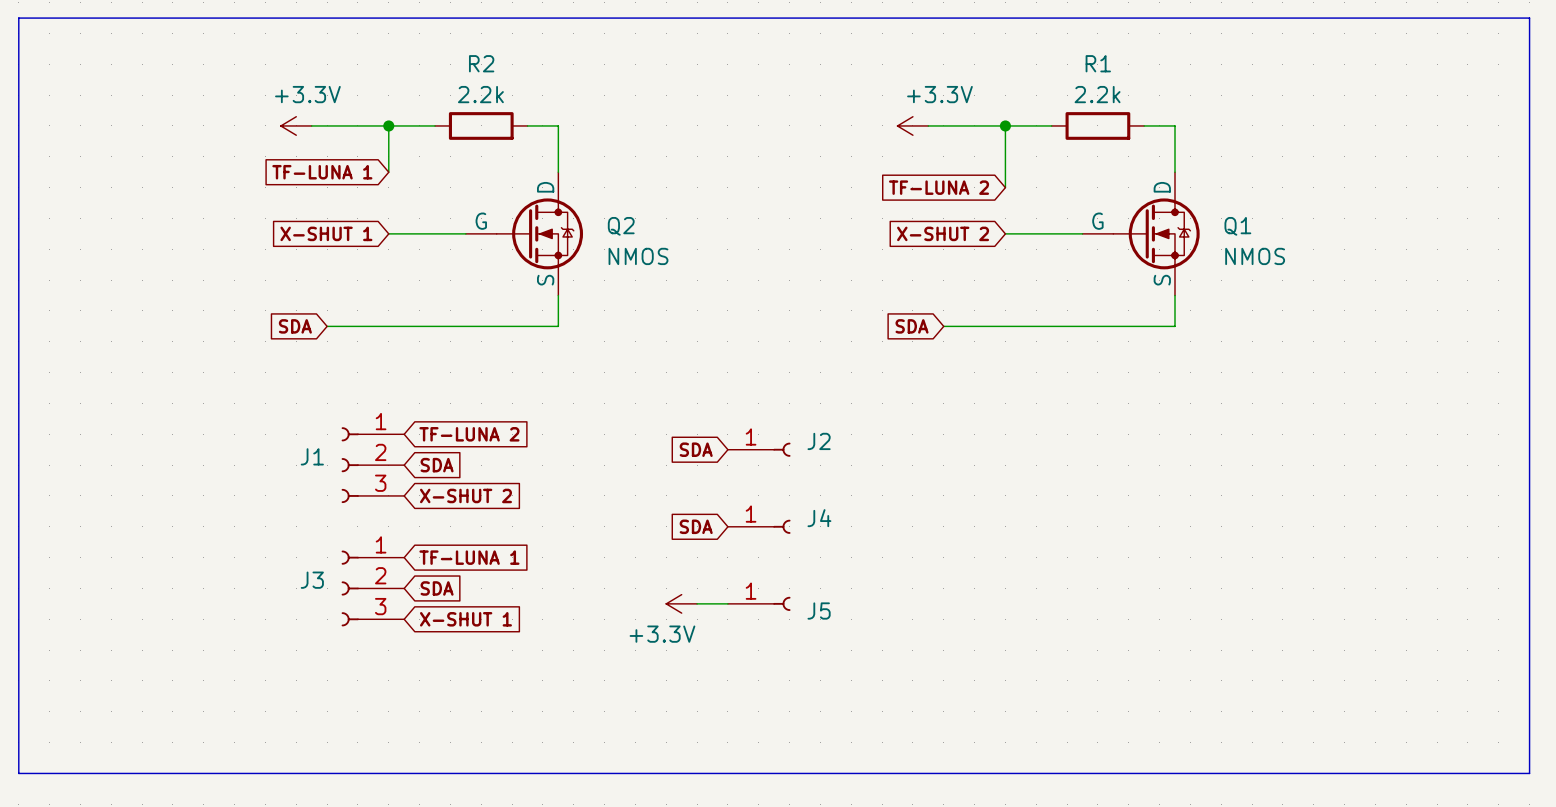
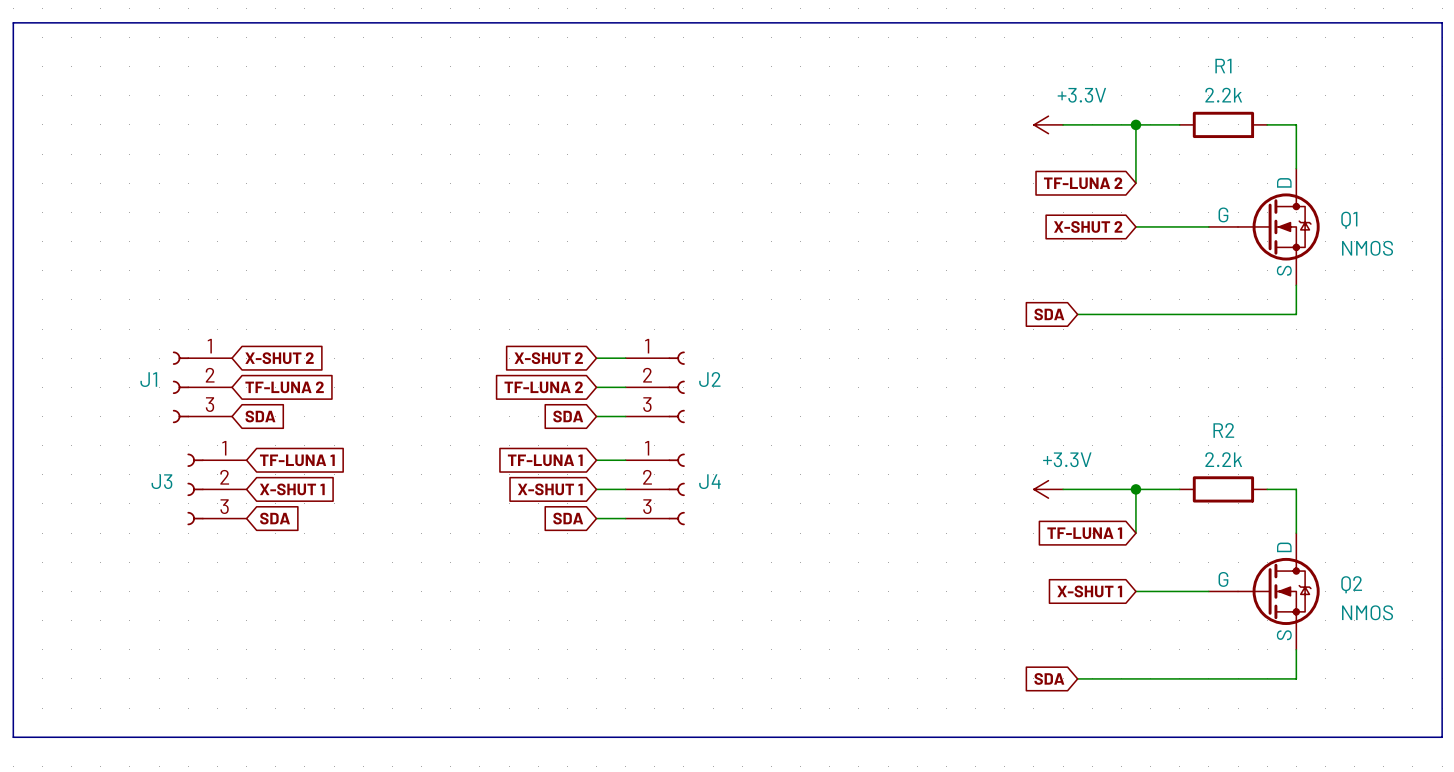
power symbol: +3.3V (296, 125) -> none
wire: (311, 125) (435, 125) -> none
wire: (388, 125) (388, 172) -> none
junction: (388, 125) -> none
R2 position: (481, 125) -> (1223, 489)
wire: (527, 125) (558, 125) (558, 172) -> none
power symbol position: +3.3V (912, 125) -> +3.3V (1048, 124)
wire: (928, 125) (1051, 125) -> none
wire: (1005, 125) (1005, 187) -> (1135, 124) (1135, 183)
junction: (1005, 125) -> none
R1 position: (1097, 125) -> (1223, 124)
wire: (1174, 125) (1174, 172) -> (1106, 124) (1179, 124)
junction: none -> (1135, 124)
wire: none -> (1267, 124) (1296, 124) (1296, 168)
global label: TF-LUNA 1 (322, 172) -> none
global label position: TF-LUNA 2 (939, 187) -> TF-LUNA 2 (1083, 183)
global label: X-SHUT 1 (326, 233) -> none
wire: (388, 233) (465, 233) -> none
Q2 position: (524, 233) -> (1264, 591)
global label: X-SHUT 2 (943, 233) -> none
wire: (1005, 233) (1082, 233) -> (1135, 226) (1208, 226)
Q1 position: (1141, 233) -> (1264, 226)
global label: none -> X-SHUT 2 (1088, 226)
wire: (558, 295) (558, 326) (327, 326) -> none
wire: (1174, 295) (1174, 326) -> (1296, 285) (1296, 314) (1106, 314)
global label: SDA (295, 326) -> none
global label: SDA (912, 326) -> none
wire: (943, 326) (1144, 326) -> none
global label: none -> SDA (1049, 314)
global label: none -> X-SHUT 2 (279, 358)
global label: none -> X-SHUT 2 (548, 358)
wire: none -> (596, 358) (625, 358)
global label: none -> TF-LUNA 2 (284, 387)
global label: none -> TF-LUNA 2 (543, 387)
wire: none -> (596, 387) (625, 387)
global label: none -> SDA (260, 416)
global label: TF-LUNA 2 (469, 434) -> none
global label: none -> SDA (568, 416)
wire: none -> (596, 416) (625, 416)
J2 symbol: [727, 442, 791, 457] -> [625, 351, 685, 424]
global label: SDA (696, 449) -> none
J1 position: (372, 465) -> (202, 387)
global label: SDA (437, 465) -> none
global label: none -> TF-LUNA 1 (297, 460)
global label: none -> TF-LUNA 1 (545, 460)
wire: none -> (596, 460) (625, 460)
global label: X-SHUT 2 (465, 495) -> X-SHUT 1 (550, 489)
global label: none -> X-SHUT 1 (292, 489)
wire: none -> (596, 489) (625, 489)
power symbol: none -> +3.3V (1048, 489)
wire: none -> (1063, 489) (1179, 489)
wire: none -> (1135, 489) (1135, 533)
junction: none -> (1135, 489)
wire: none -> (1267, 489) (1296, 489) (1296, 533)
J4 symbol: [727, 519, 791, 534] -> [625, 453, 685, 526]
global label: SDA (696, 526) -> none
global label: none -> SDA (275, 518)
global label: none -> SDA (568, 518)
global label: TF-LUNA 1 (469, 557) -> none
global label: none -> TF-LUNA 1 (1084, 533)
J3 position: (372, 588) -> (216, 489)
global label: SDA (437, 588) -> none
power symbol: +3.3V (681, 603) -> none
wire: (697, 603) (727, 603) -> (596, 518) (625, 518)
J5: (759, 603) -> none
global label: X-SHUT 1 (465, 619) -> none
global label: none -> X-SHUT 1 (1089, 591)
wire: none -> (1135, 591) (1208, 591)
wire: none -> (1296, 649) (1296, 678) (1077, 678)
global label: none -> SDA (1049, 678)

